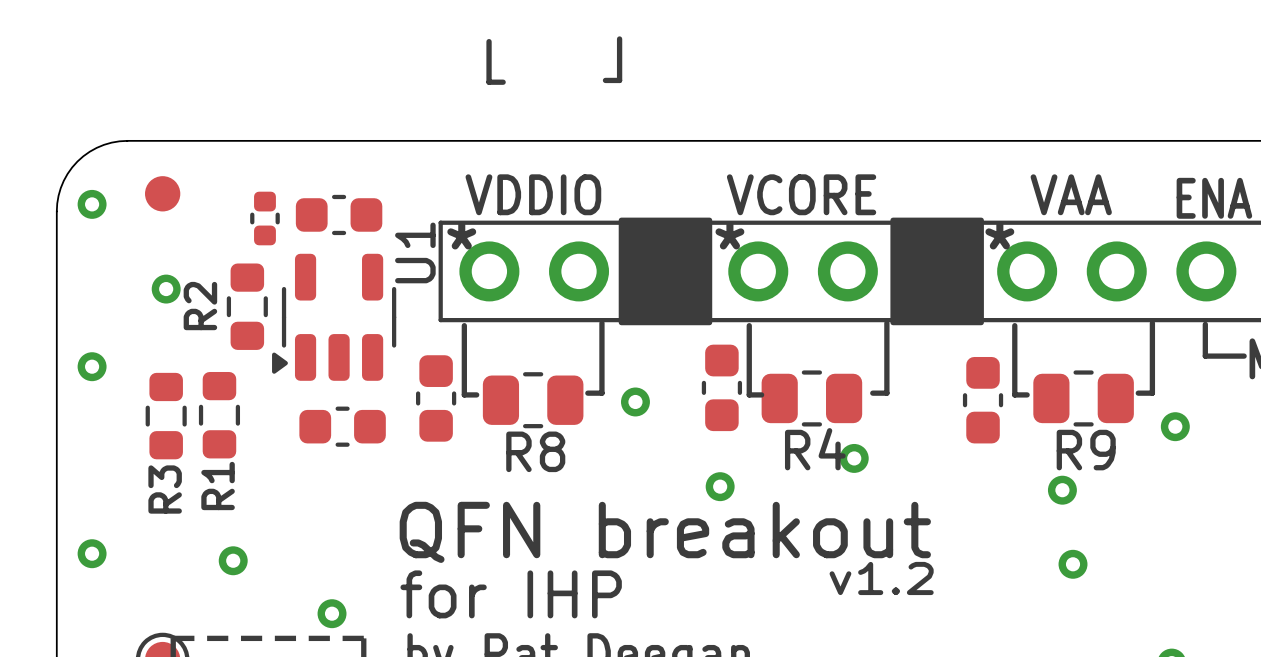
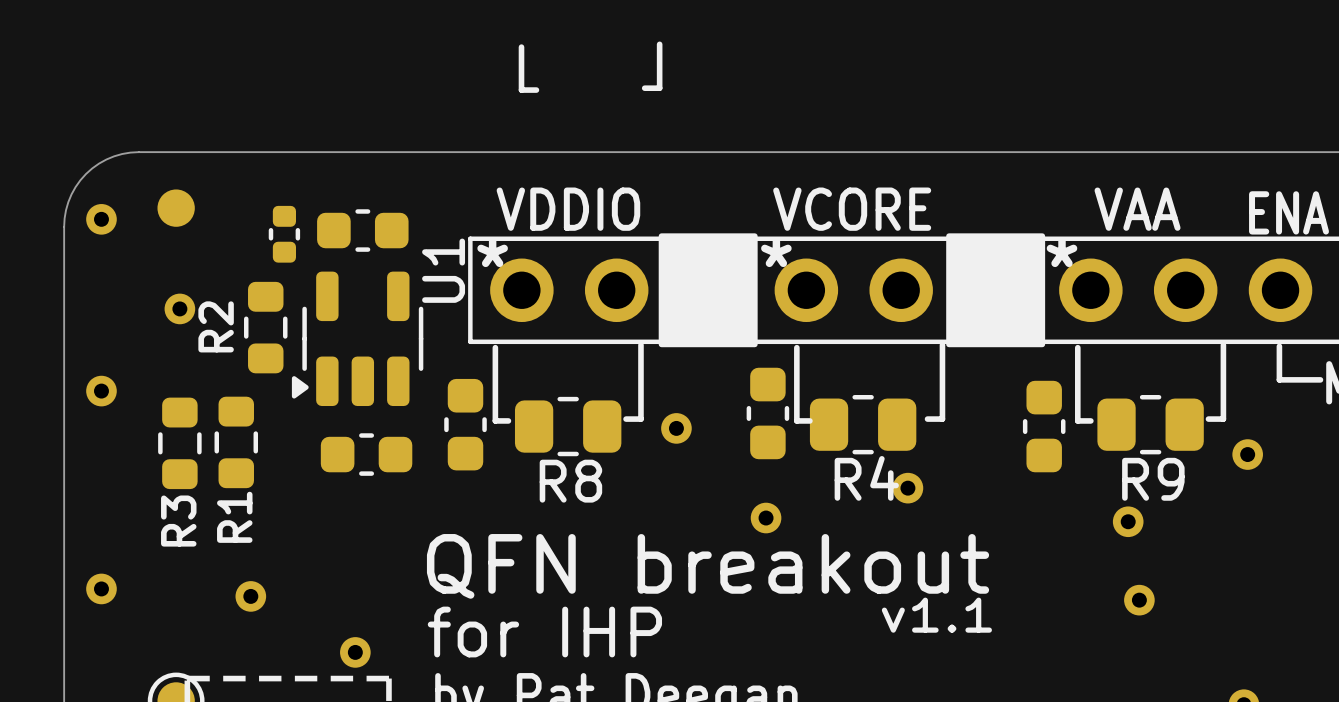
text: v1.2 (881, 578) -> v1.1 (936, 615)

